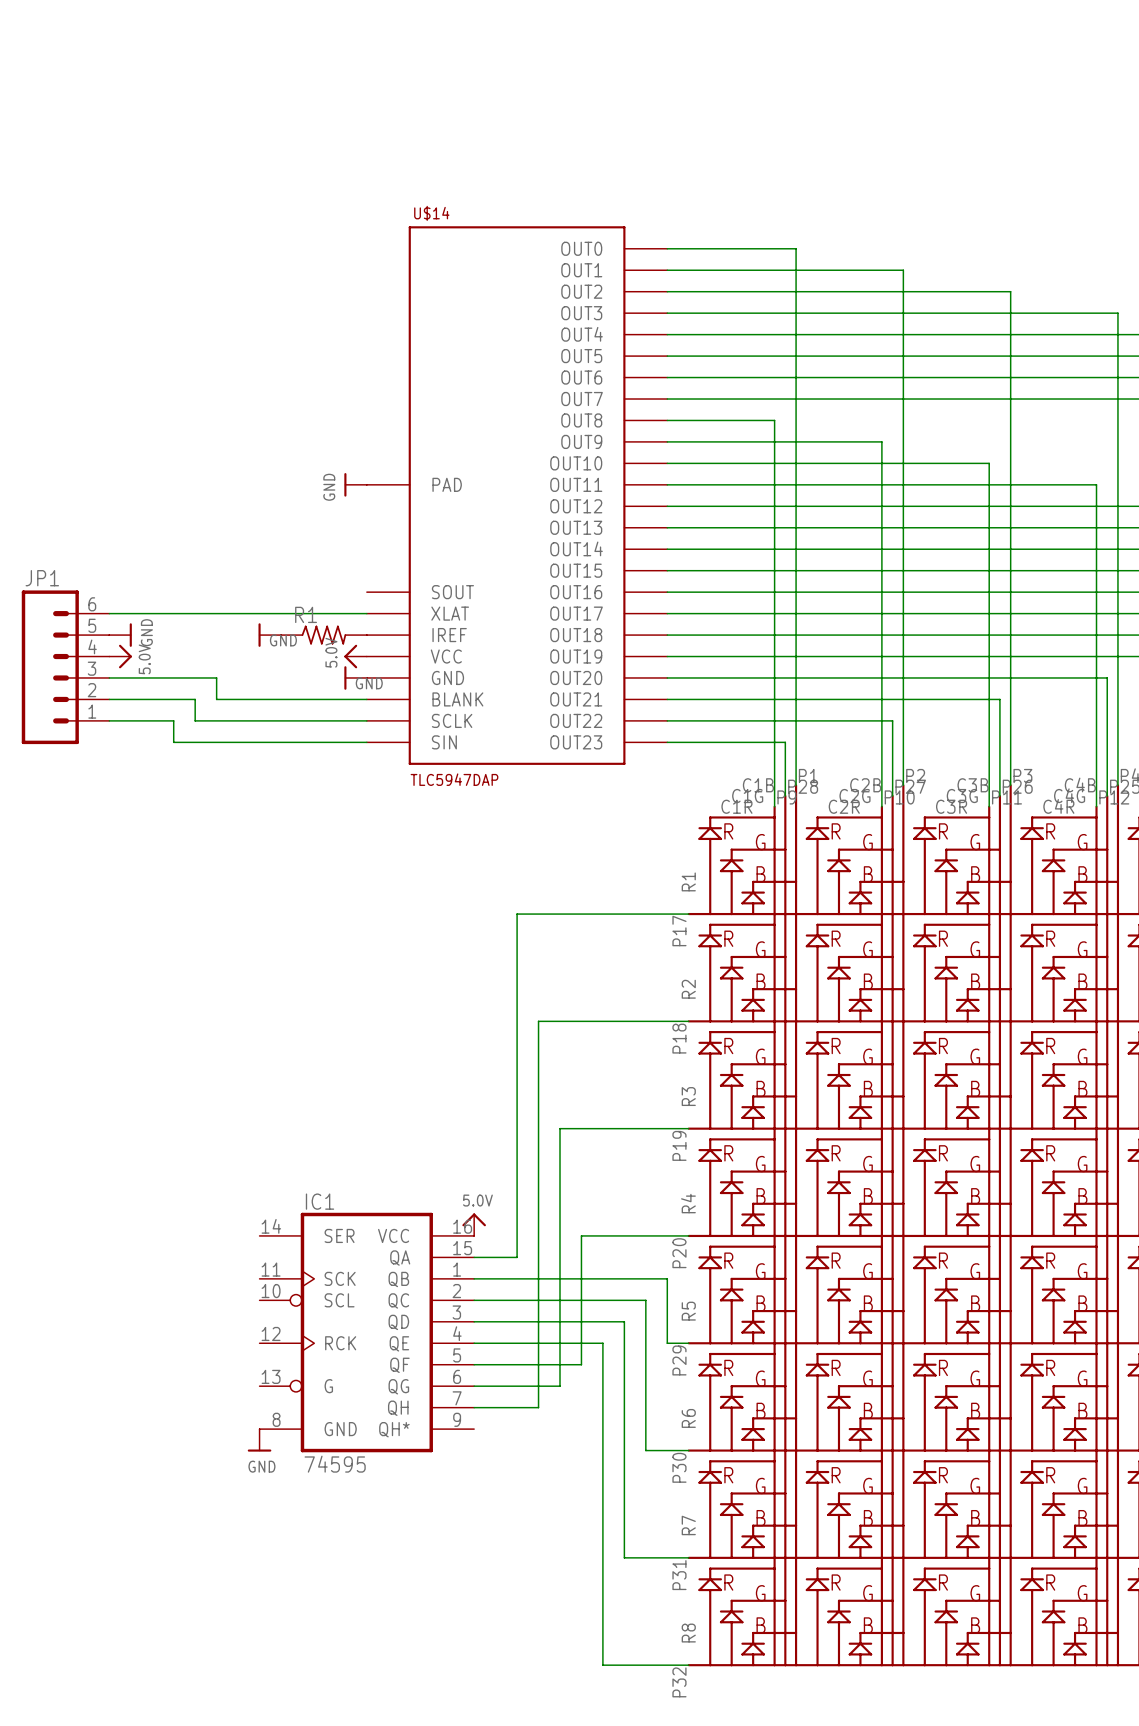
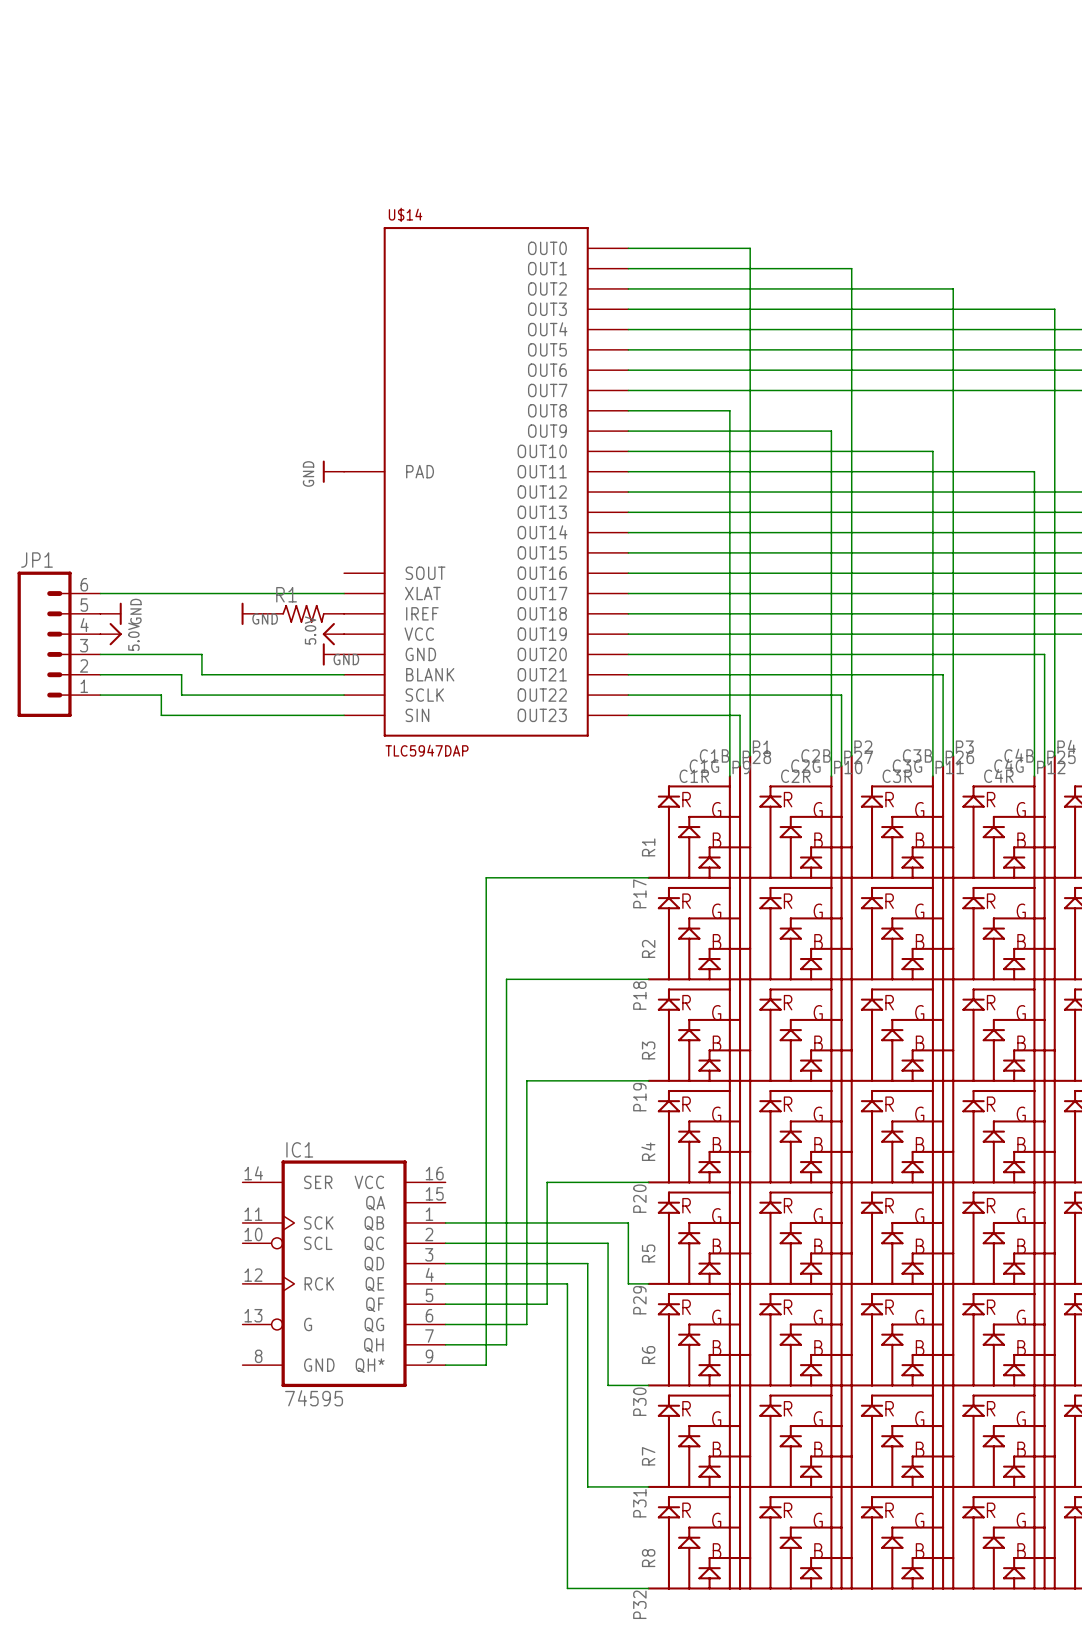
power symbol: 5.0V (474, 1224) -> none
wire: (474, 1257) (517, 1257) -> (445, 1365) (486, 1365) (486, 1202)
power symbol: GND (259, 1440) -> none

